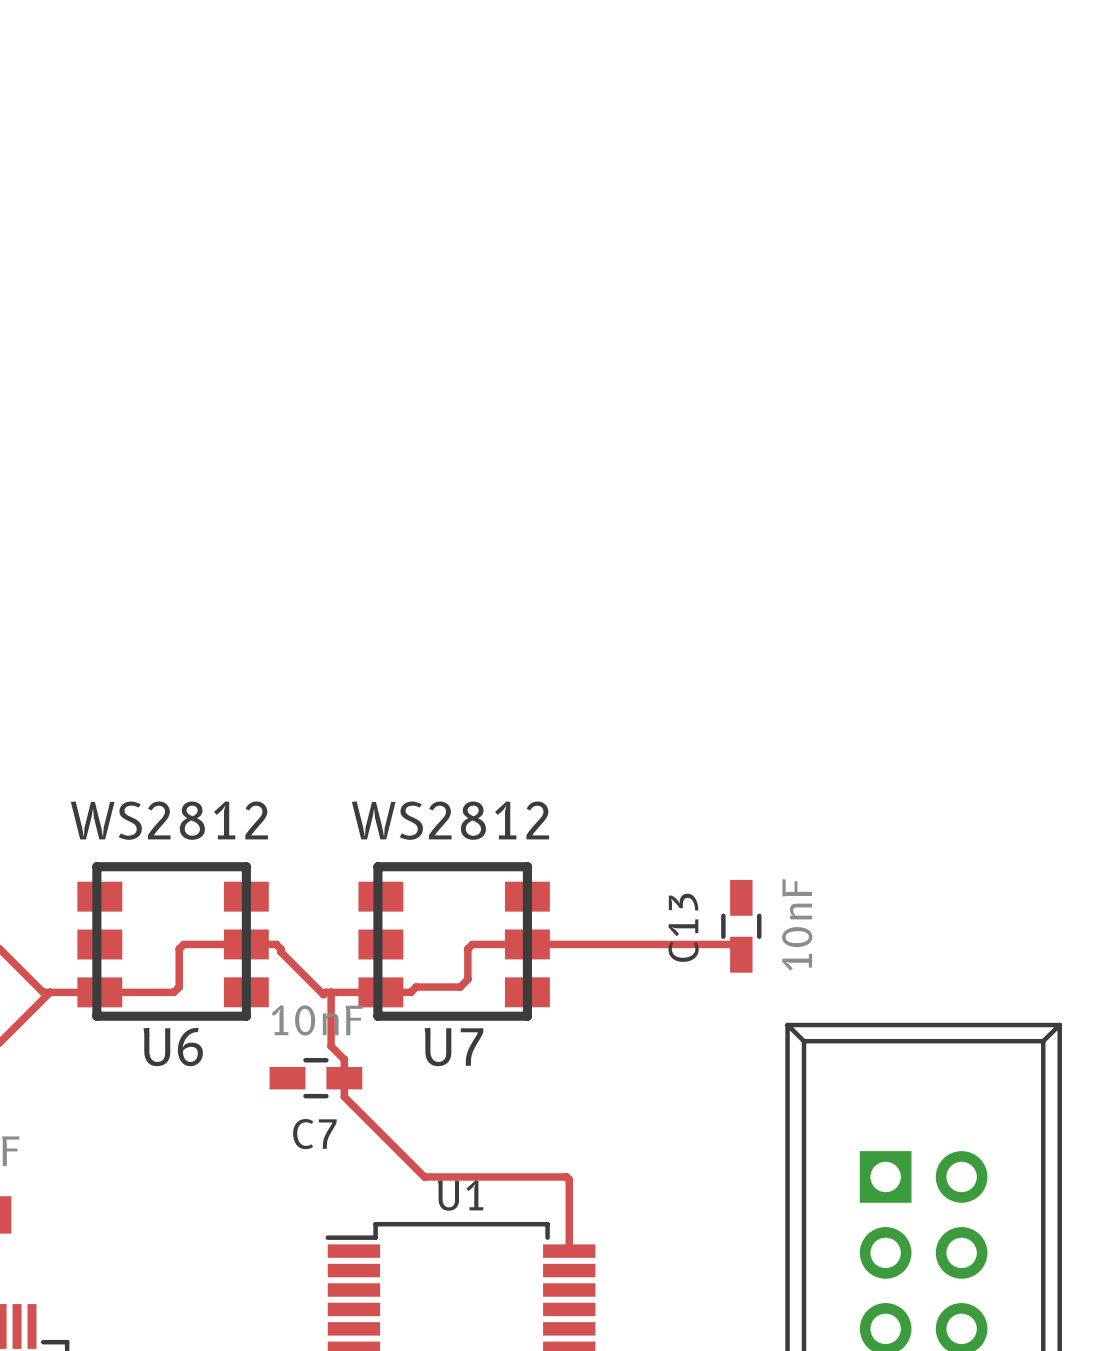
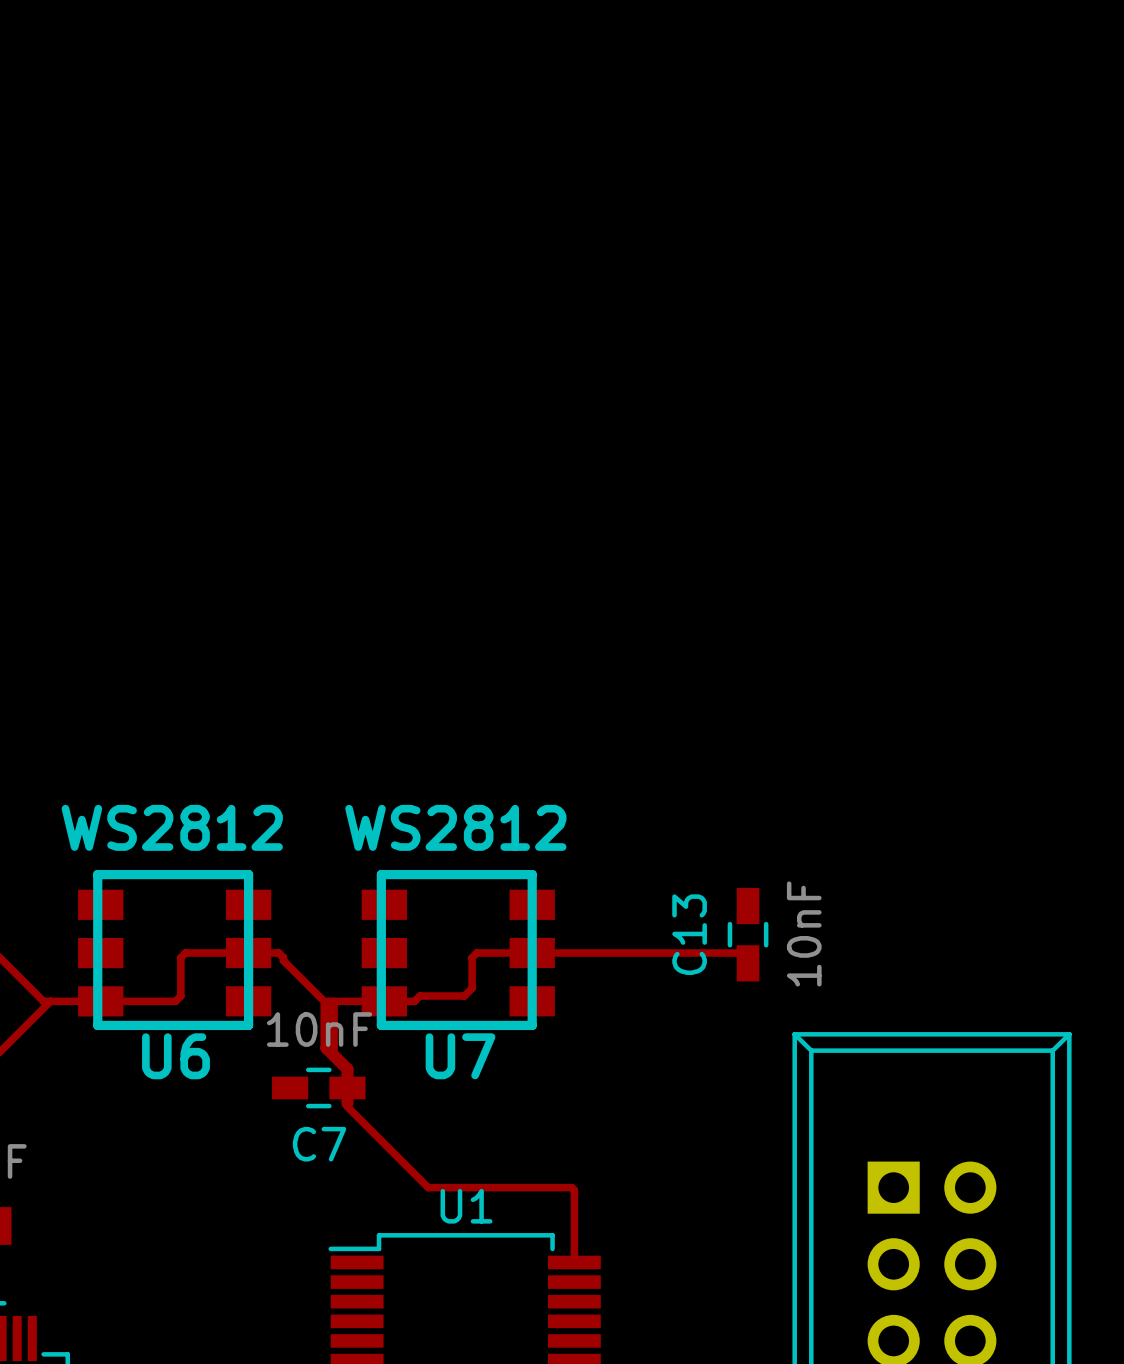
top track: none -> (326, 1003) (326, 1048) (347, 1069) (347, 1103)

